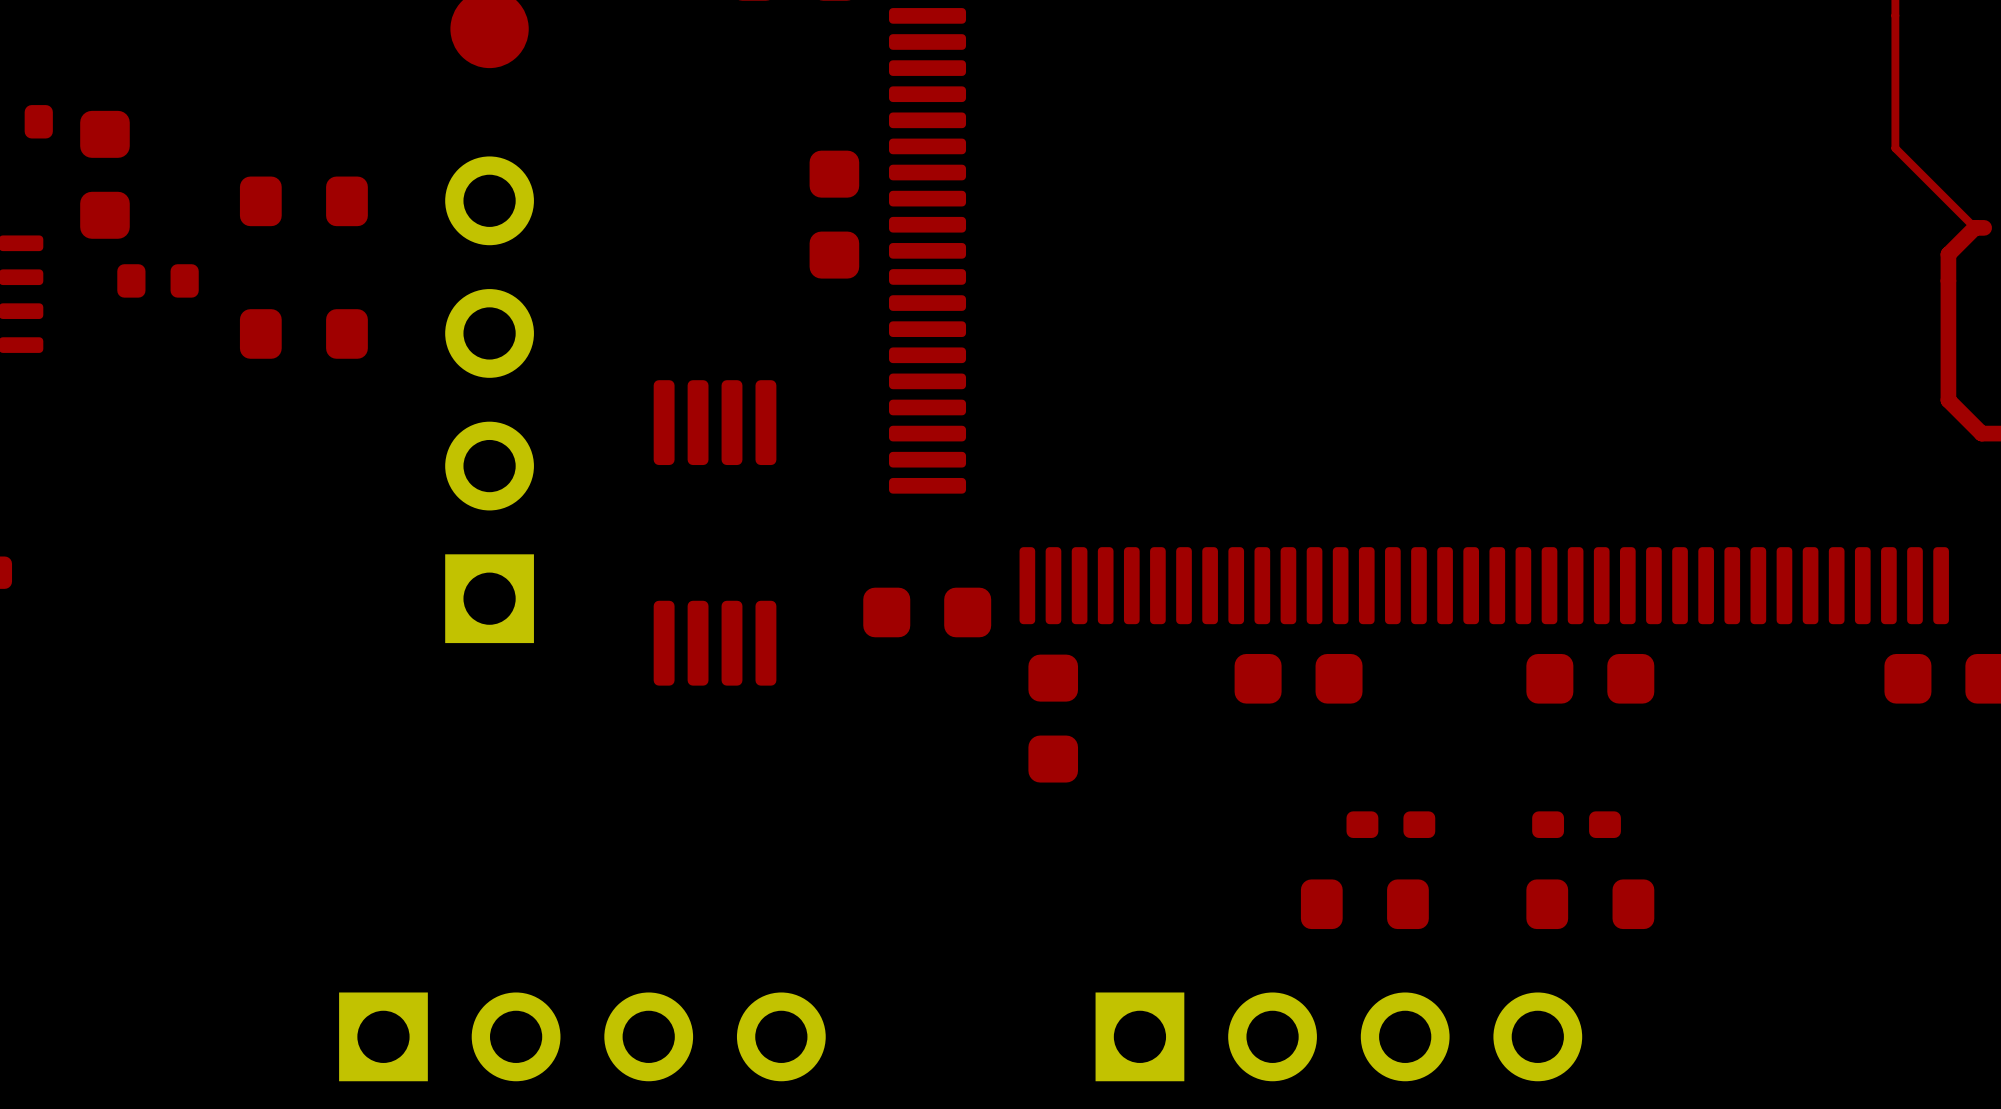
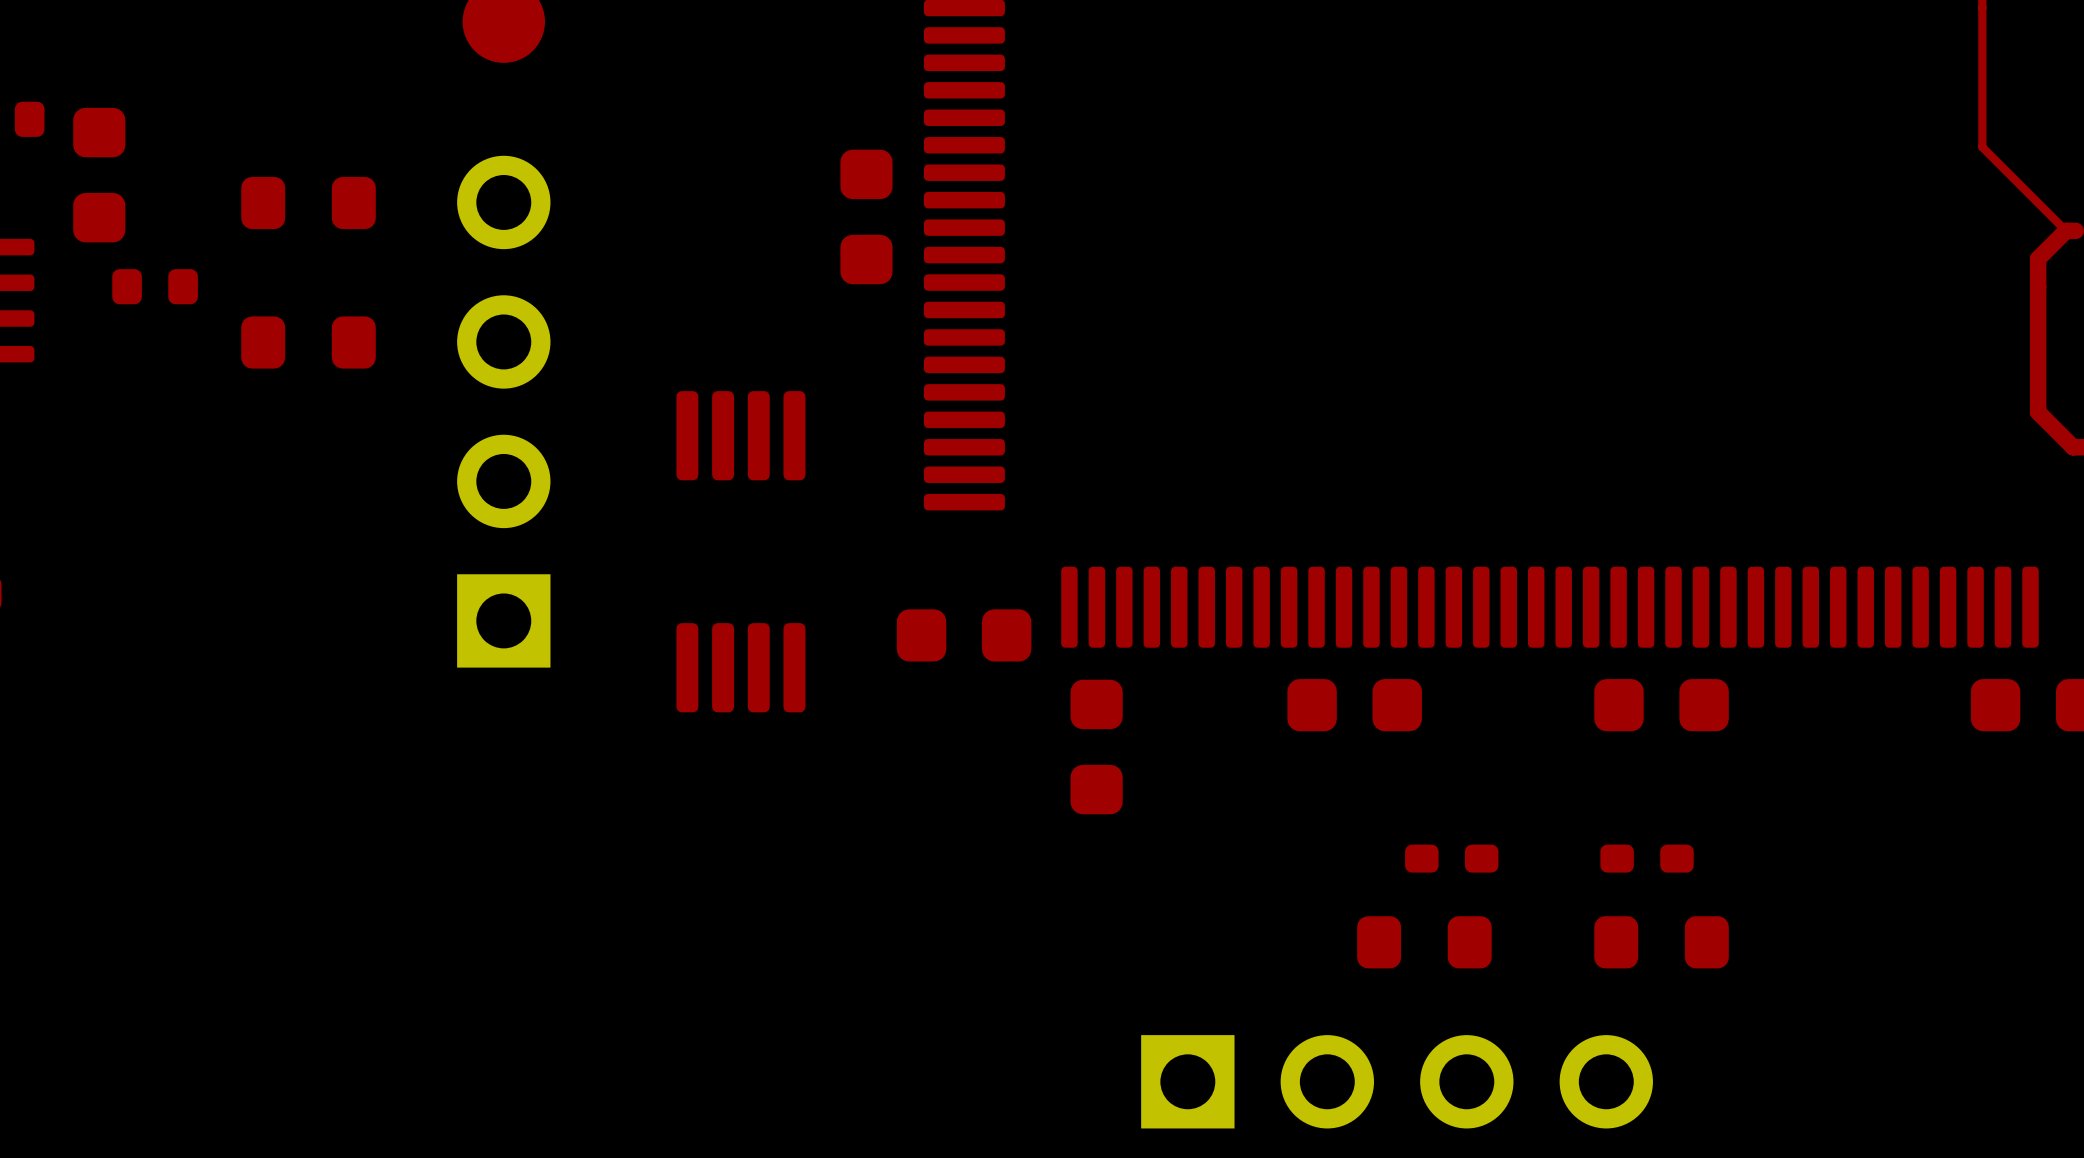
part: (582, 1036) -> none

